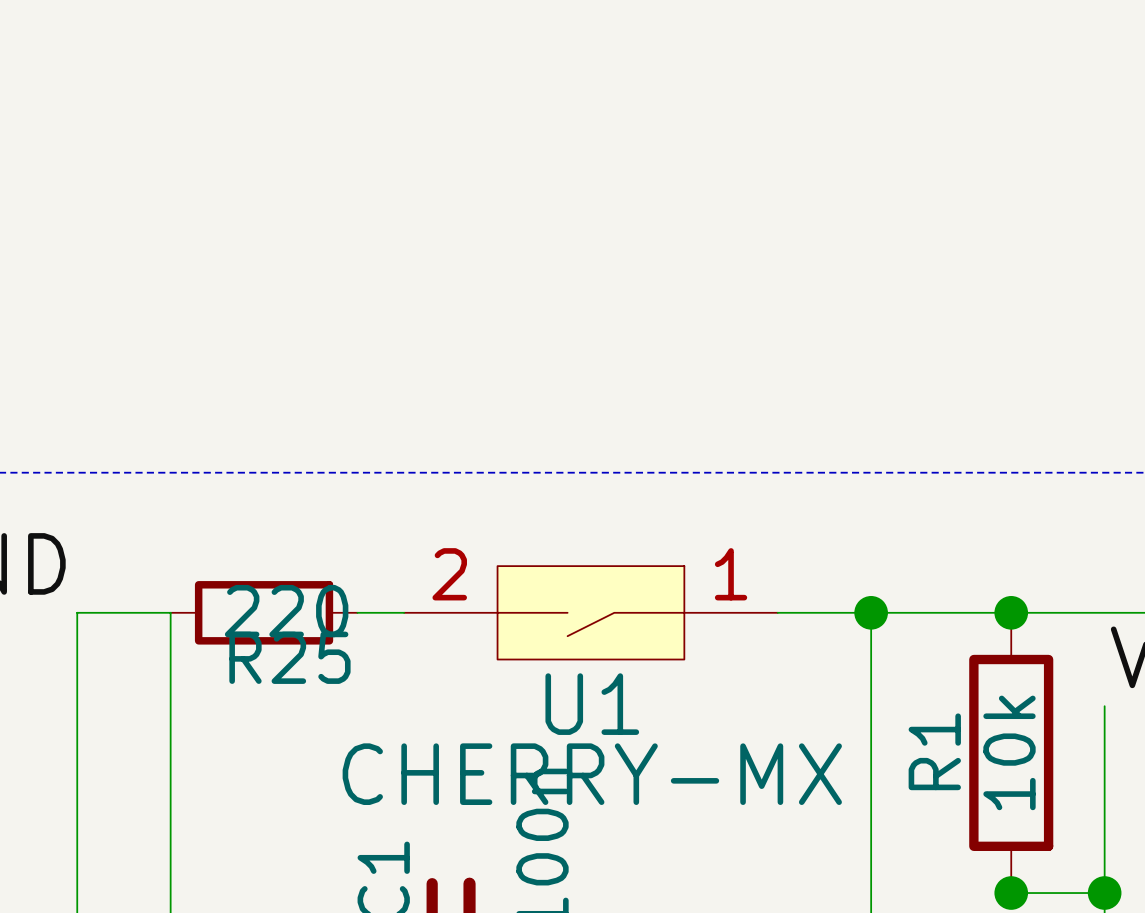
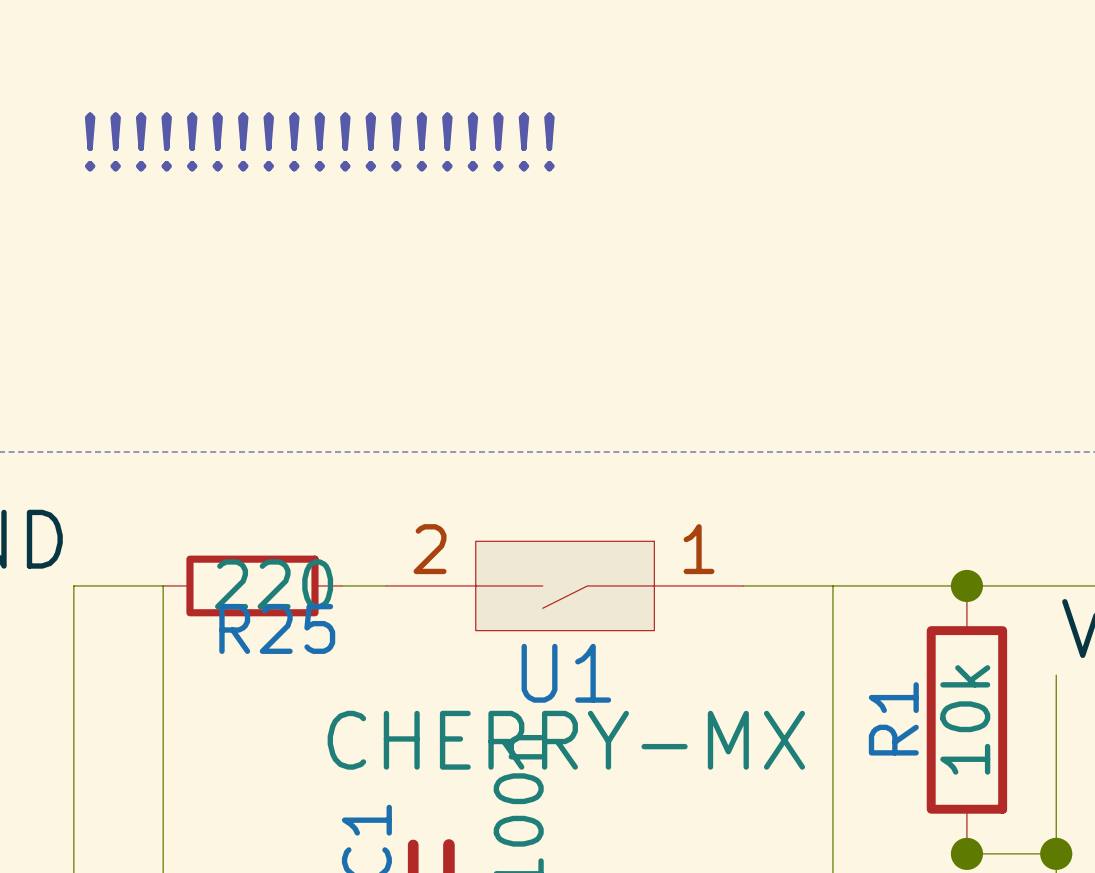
text: none -> !!!!!!!!!!!!!!!!!!! (319, 141)
junction: (871, 612) -> none

